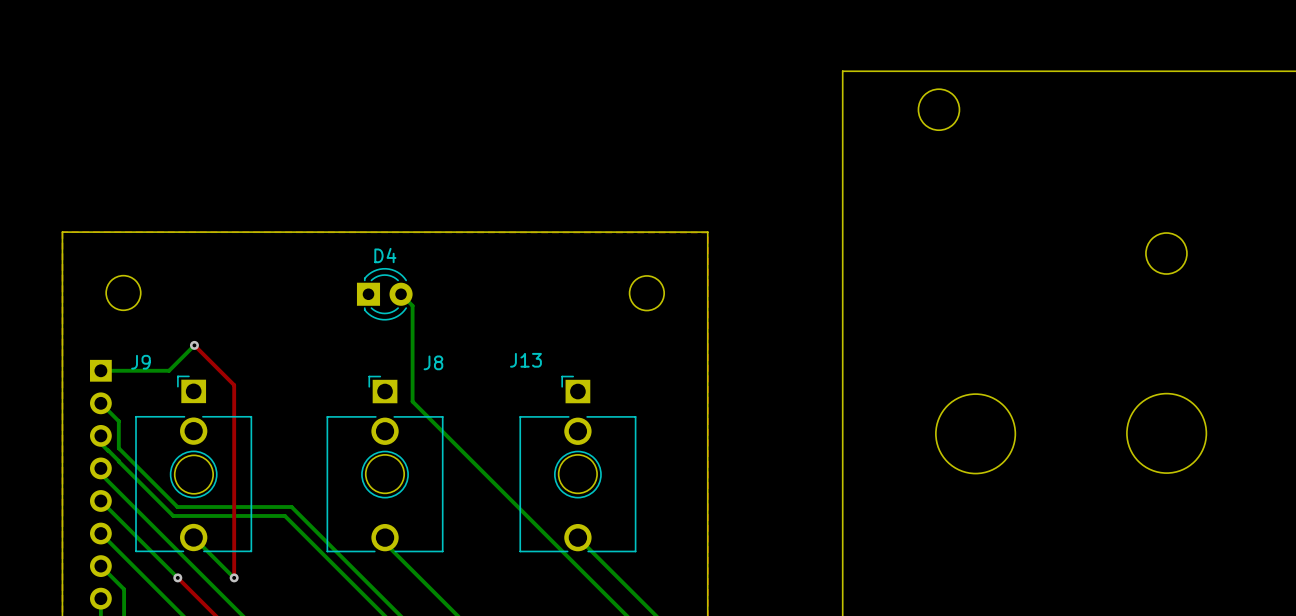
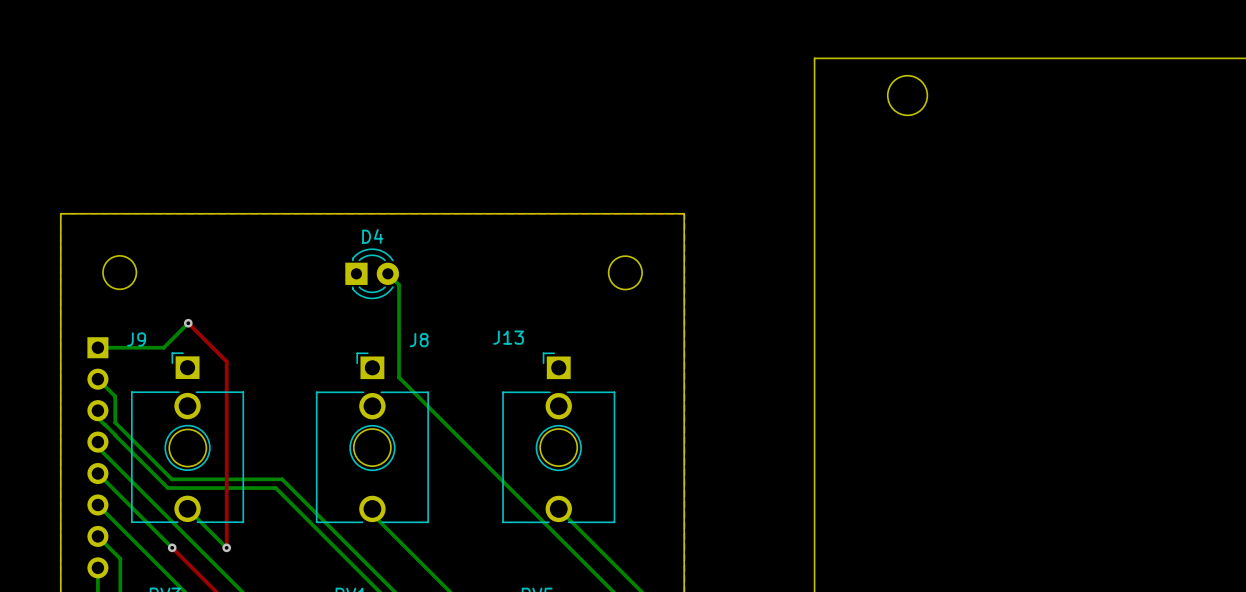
round board edge: [1145, 232, 1188, 275] -> none
round board edge: [935, 393, 1016, 474] -> none
round board edge: [1126, 393, 1207, 474] -> none

